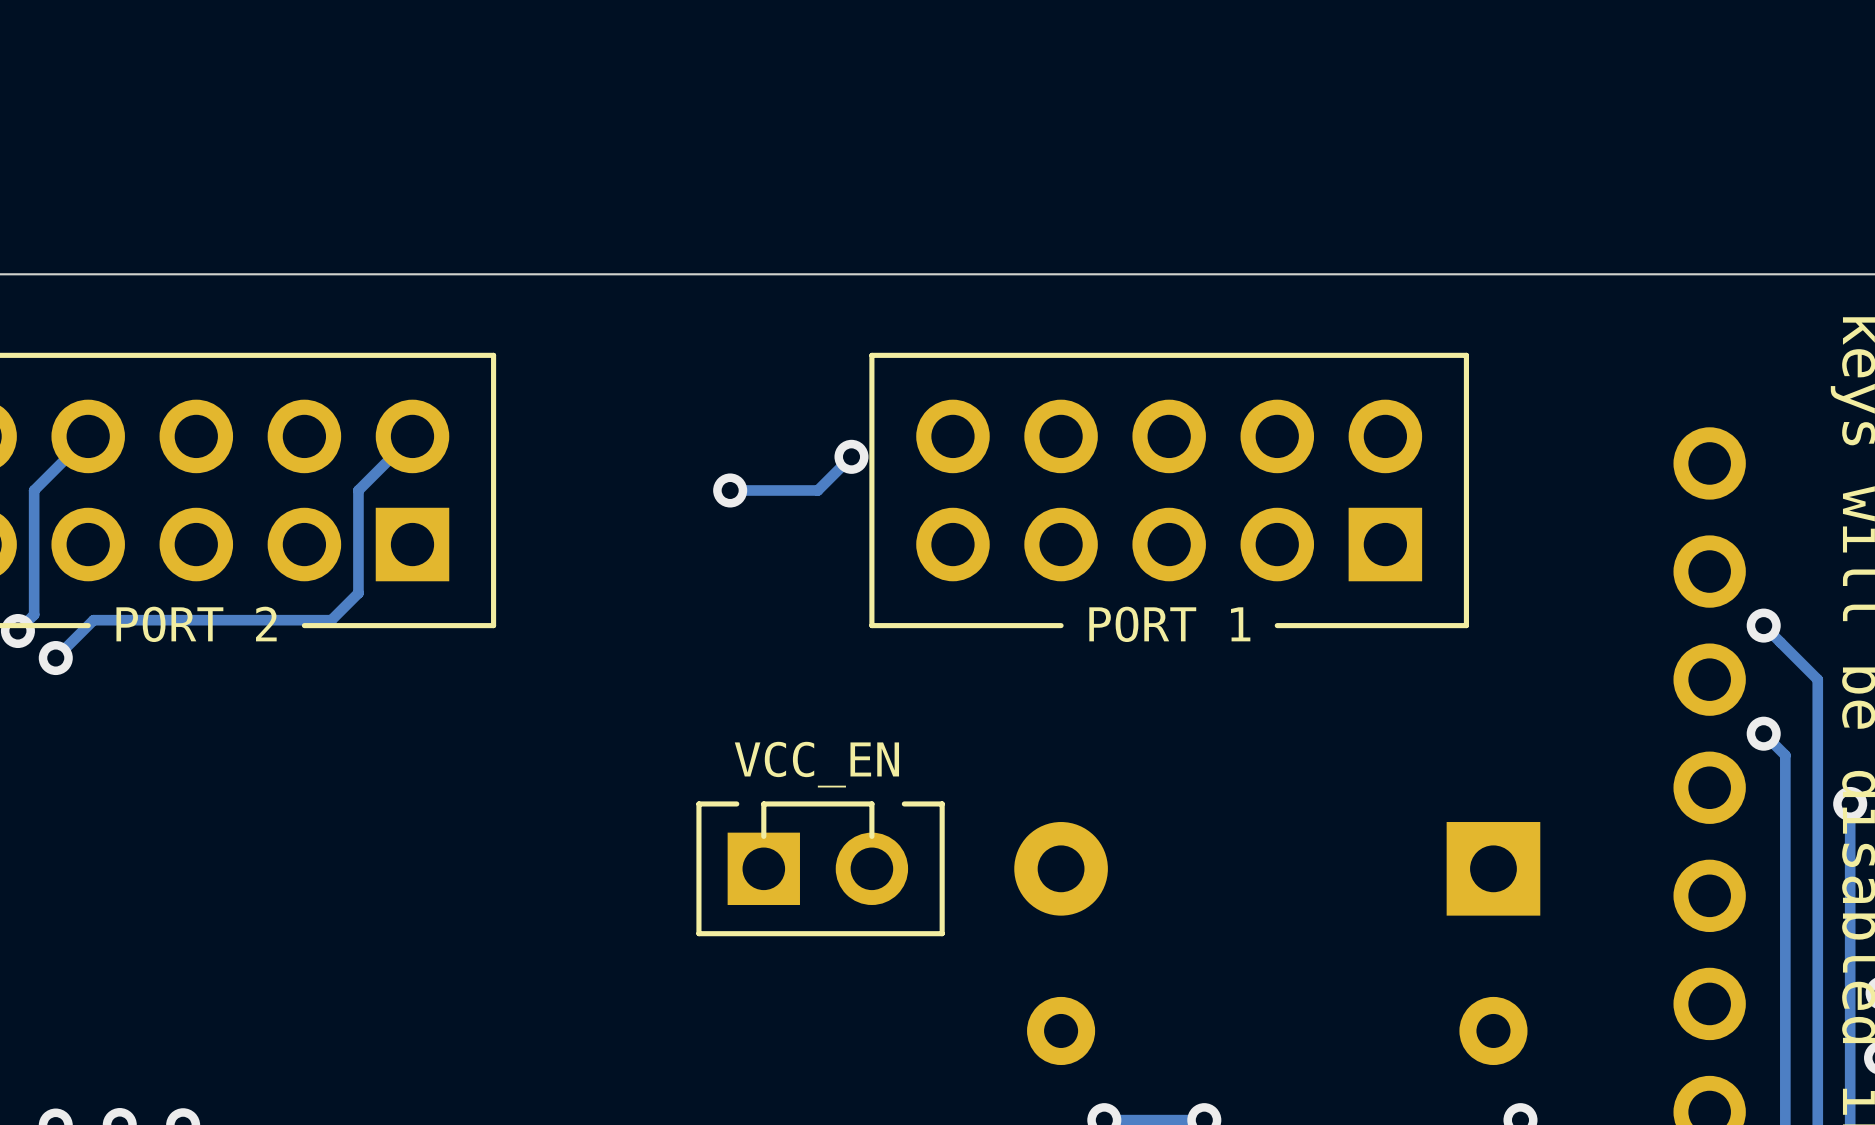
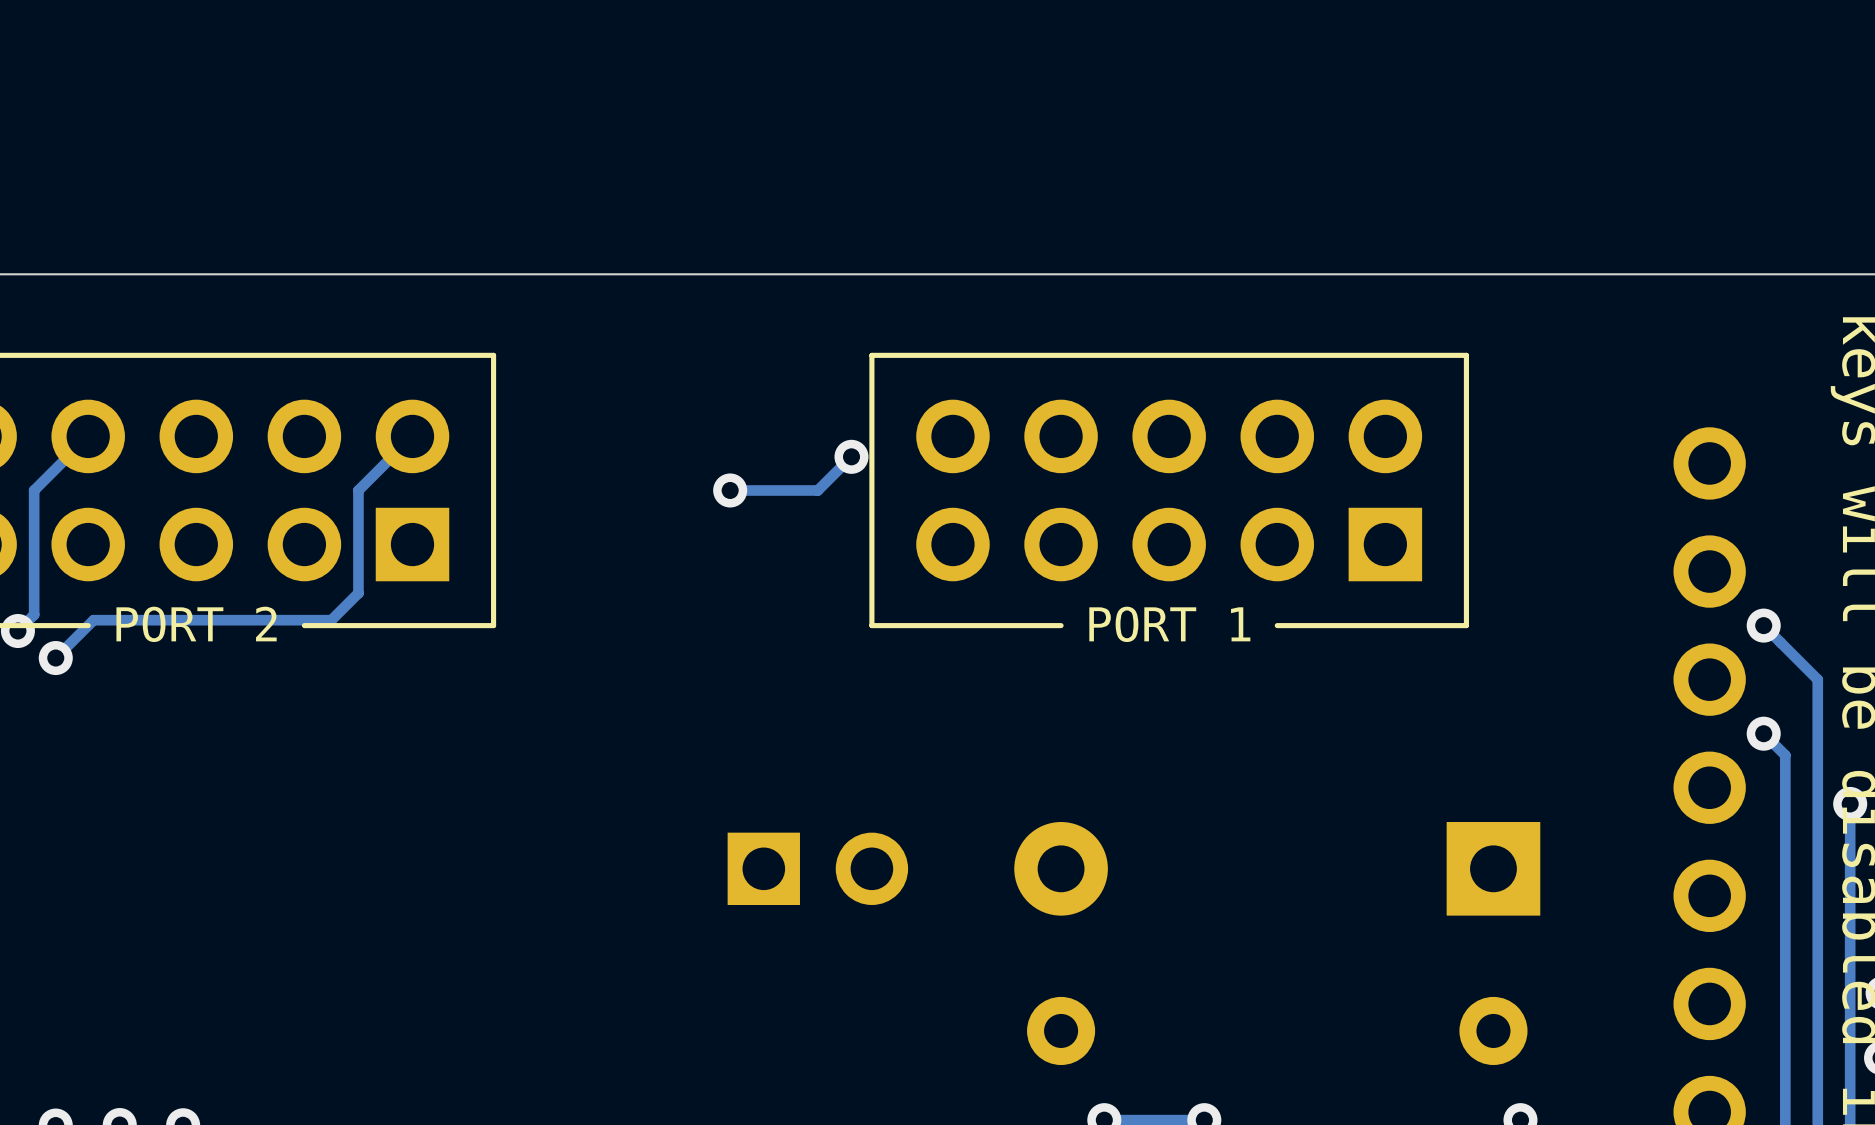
text: VCC_EN (816, 764) -> none
line: (904, 803) (942, 803) (942, 933) (698, 933) (698, 803) (736, 803) -> none
line: (871, 836) (871, 803) (763, 803) (763, 836) -> none

